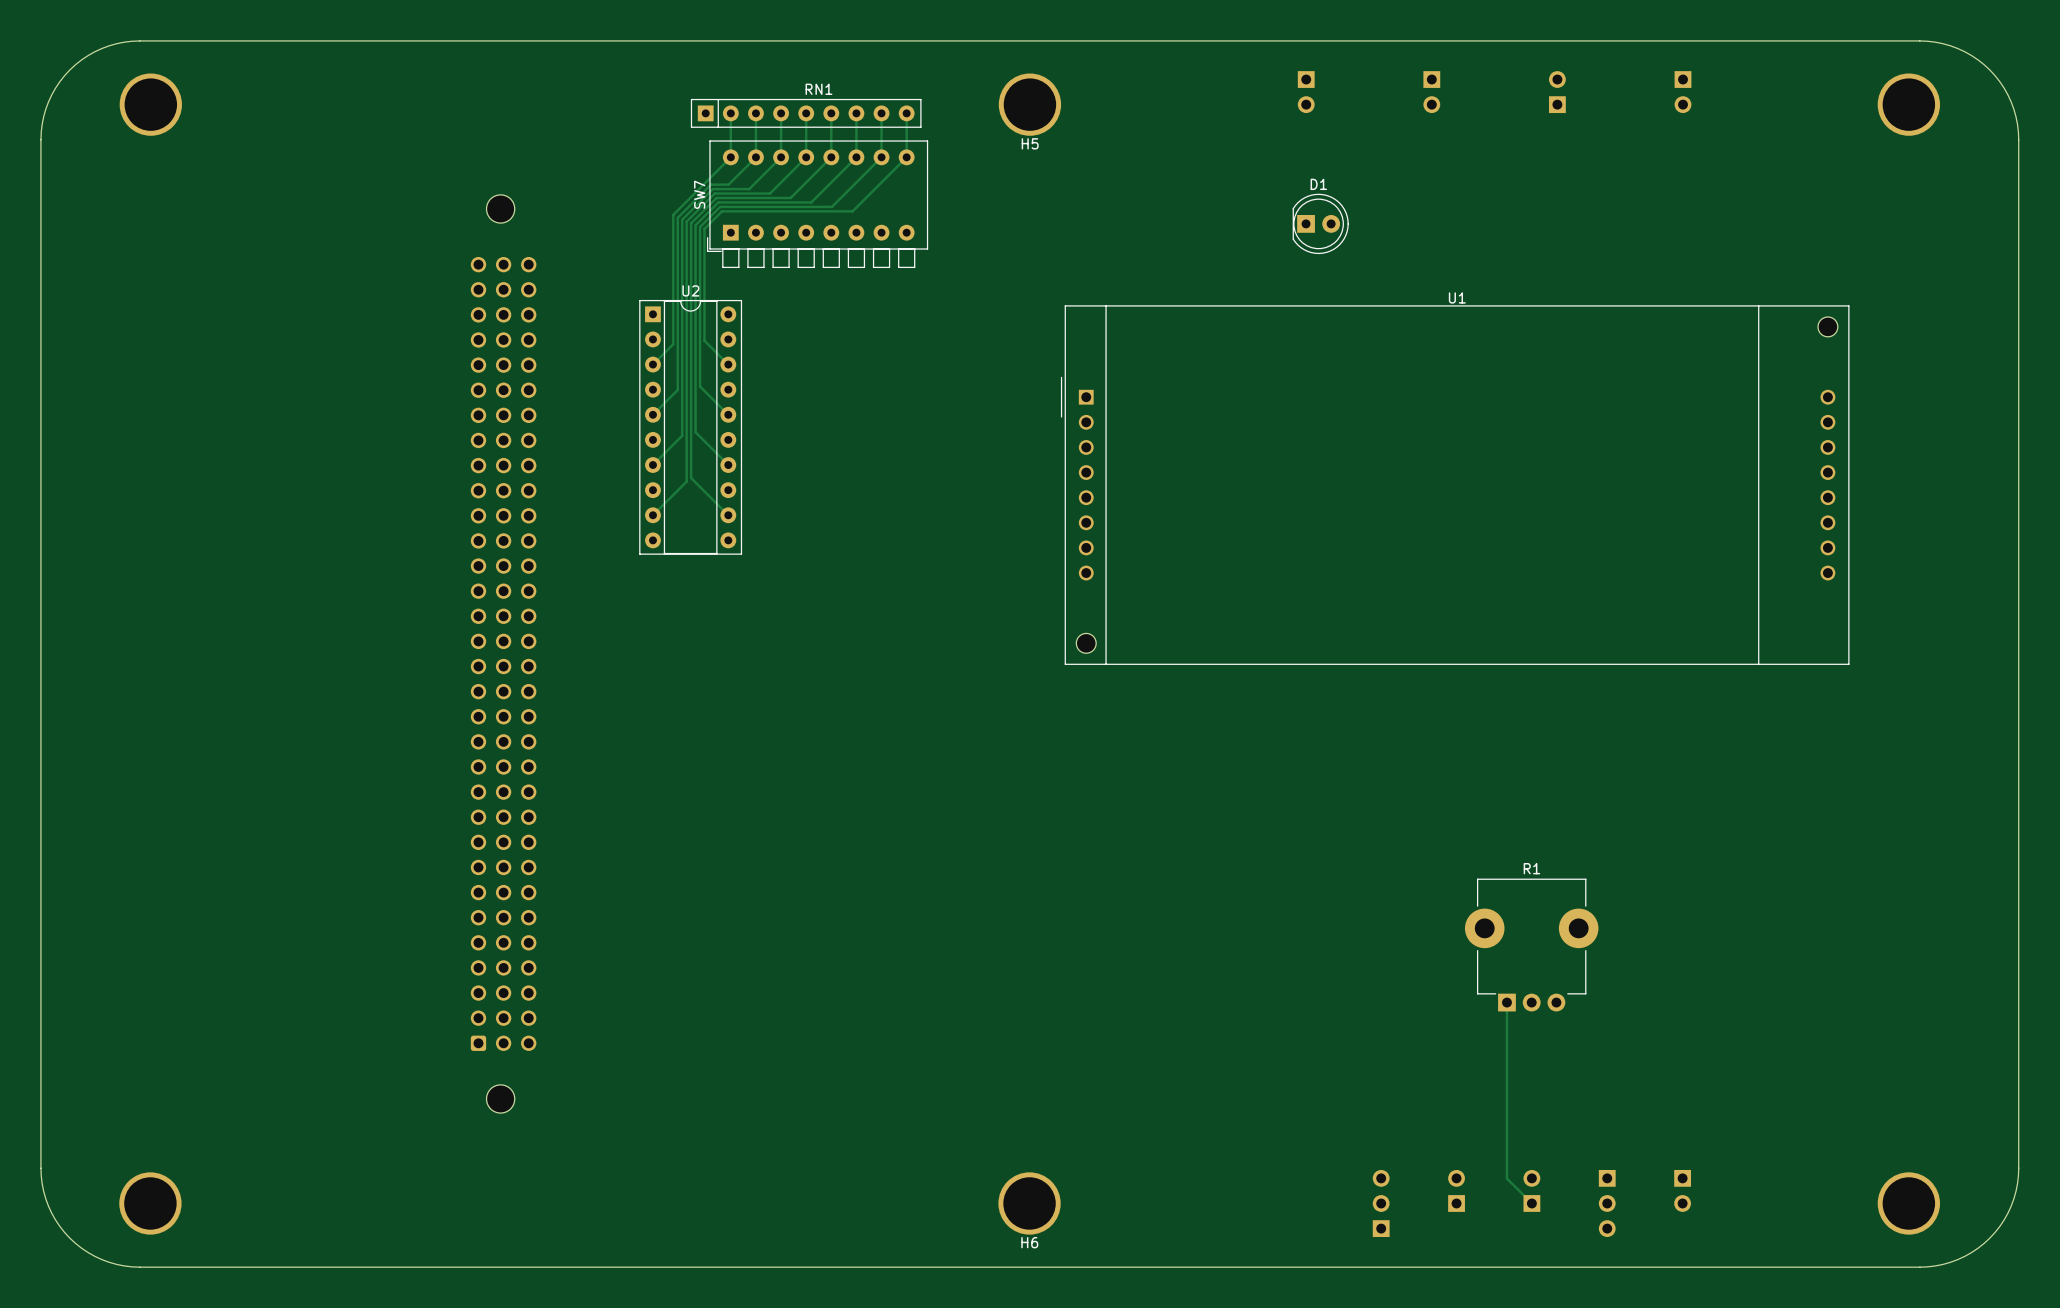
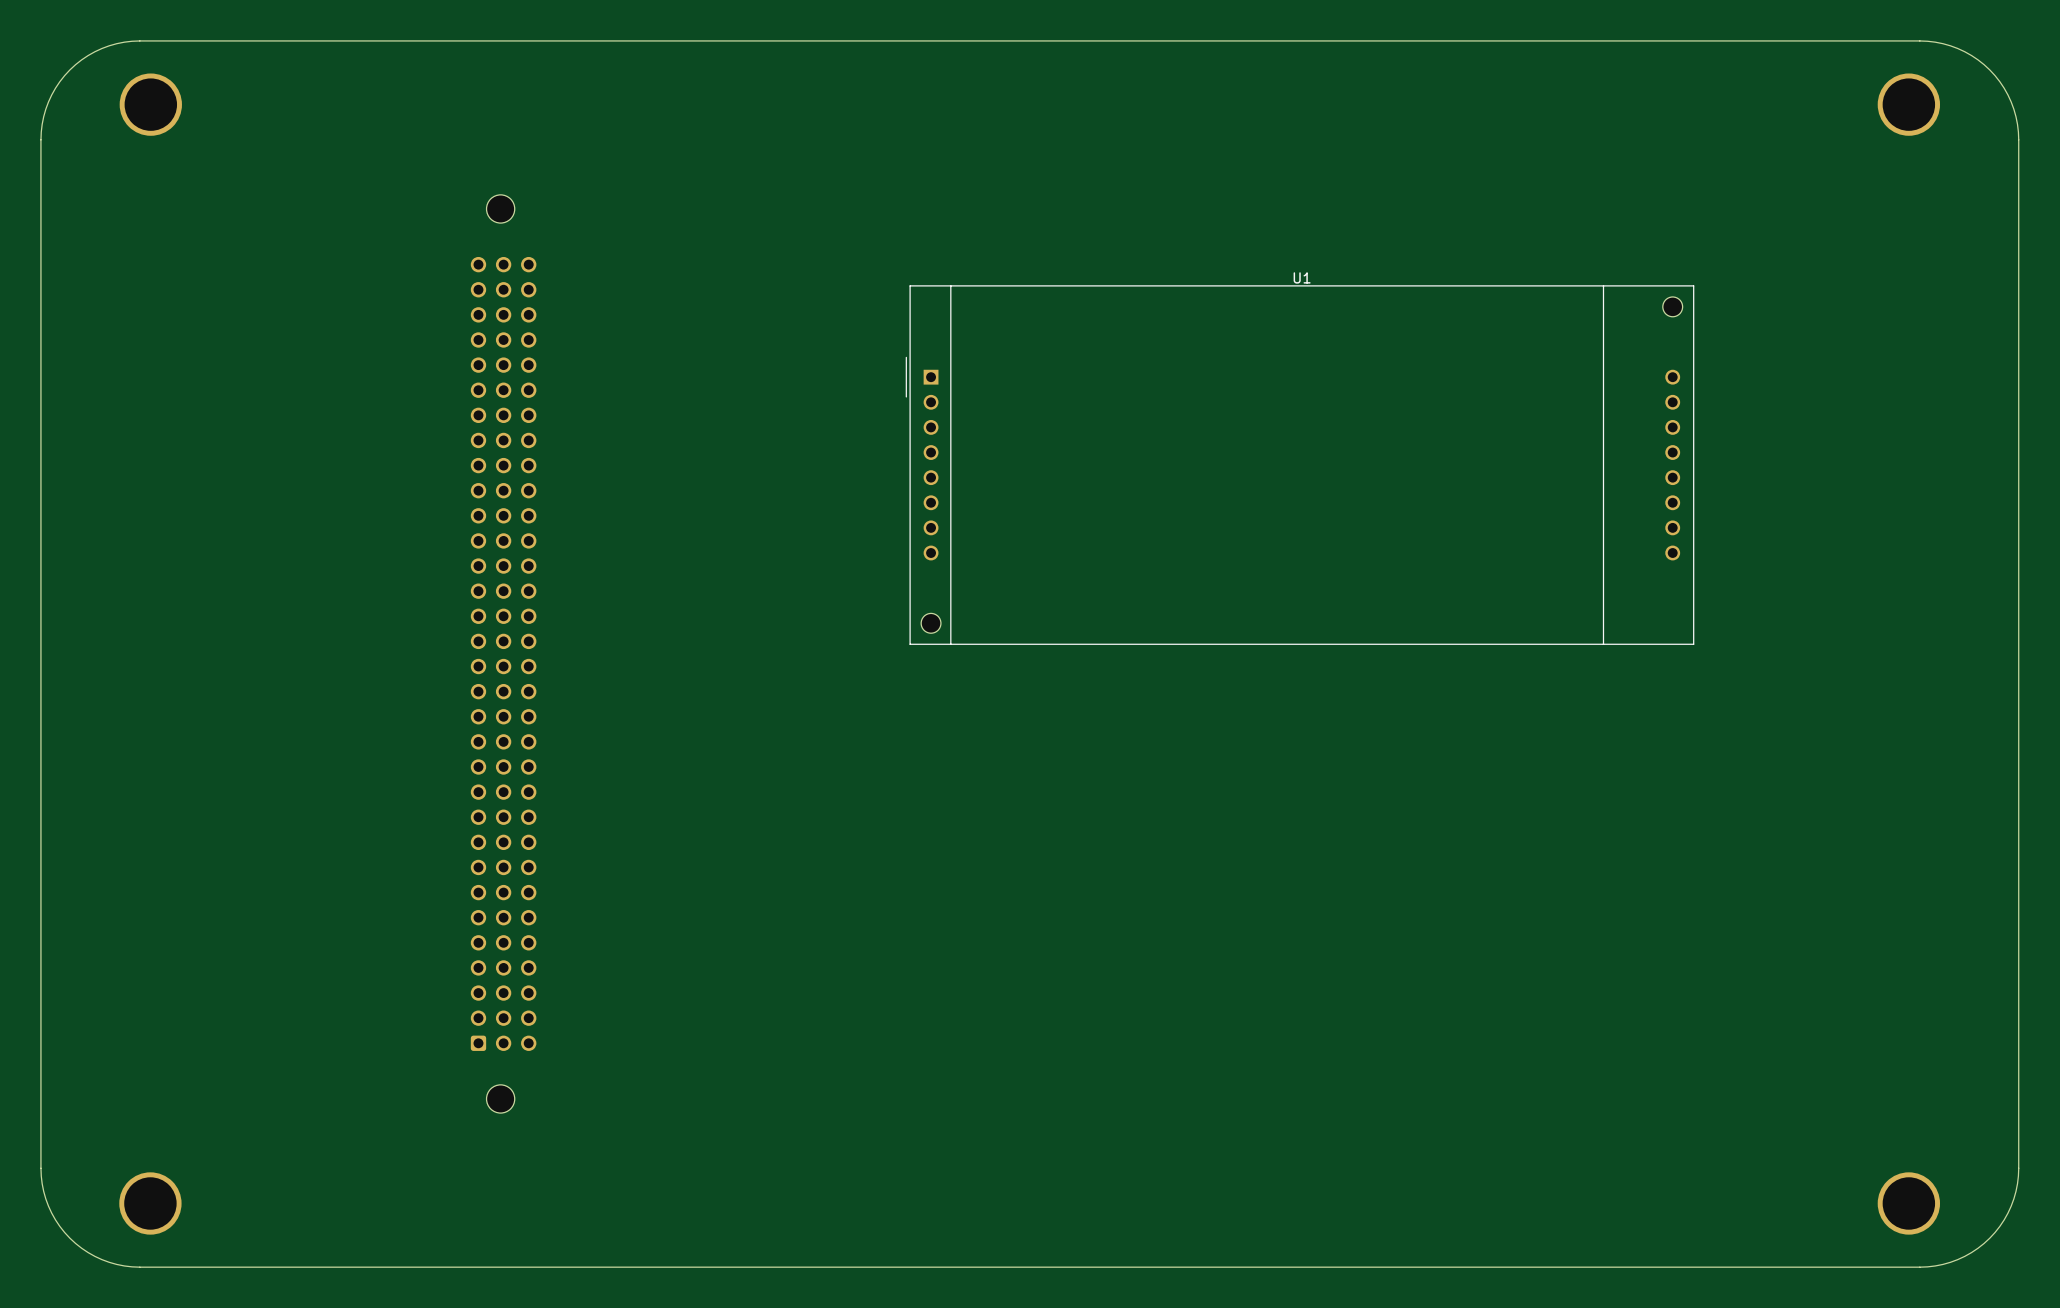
part: (1306, 92) -> none
part: (1431, 92) -> none
part: (1557, 92) -> none
part: (1683, 92) -> none
H5: (1029, 104) -> none
track: (730, 113) (730, 157) (673, 214) (673, 344) (652, 364) -> none
track: (755, 113) (755, 157) (728, 184) (710, 184) (677, 217) (677, 390) (652, 414) -> none
track: (781, 113) (781, 157) (749, 189) (712, 189) (682, 219) (682, 435) (652, 465) -> none
track: (806, 113) (806, 157) (769, 193) (714, 193) (686, 221) (686, 481) (652, 515) -> none
RN1: (806, 113) -> none
track: (831, 113) (831, 157) (790, 197) (716, 197) (691, 223) (691, 478) (728, 515) -> none
track: (856, 113) (856, 157) (811, 202) (718, 202) (695, 225) (695, 432) (728, 465) -> none
track: (881, 113) (881, 157) (831, 206) (720, 206) (700, 227) (700, 386) (728, 414) -> none
track: (906, 113) (906, 157) (852, 211) (722, 211) (704, 228) (704, 340) (728, 364) -> none
SW7: (817, 204) -> none
D1: (1320, 223) -> none
U2: (690, 427) -> none
U1 position: (1455, 485) -> (1300, 465)
R1: (1531, 945) -> none
track: (1506, 1002) (1506, 1178) (1531, 1203) -> none
part: (1456, 1190) -> none
part: (1531, 1190) -> none
part: (1682, 1190) -> none
H6: (1029, 1203) -> none
part: (1381, 1203) -> none
part: (1607, 1203) -> none

